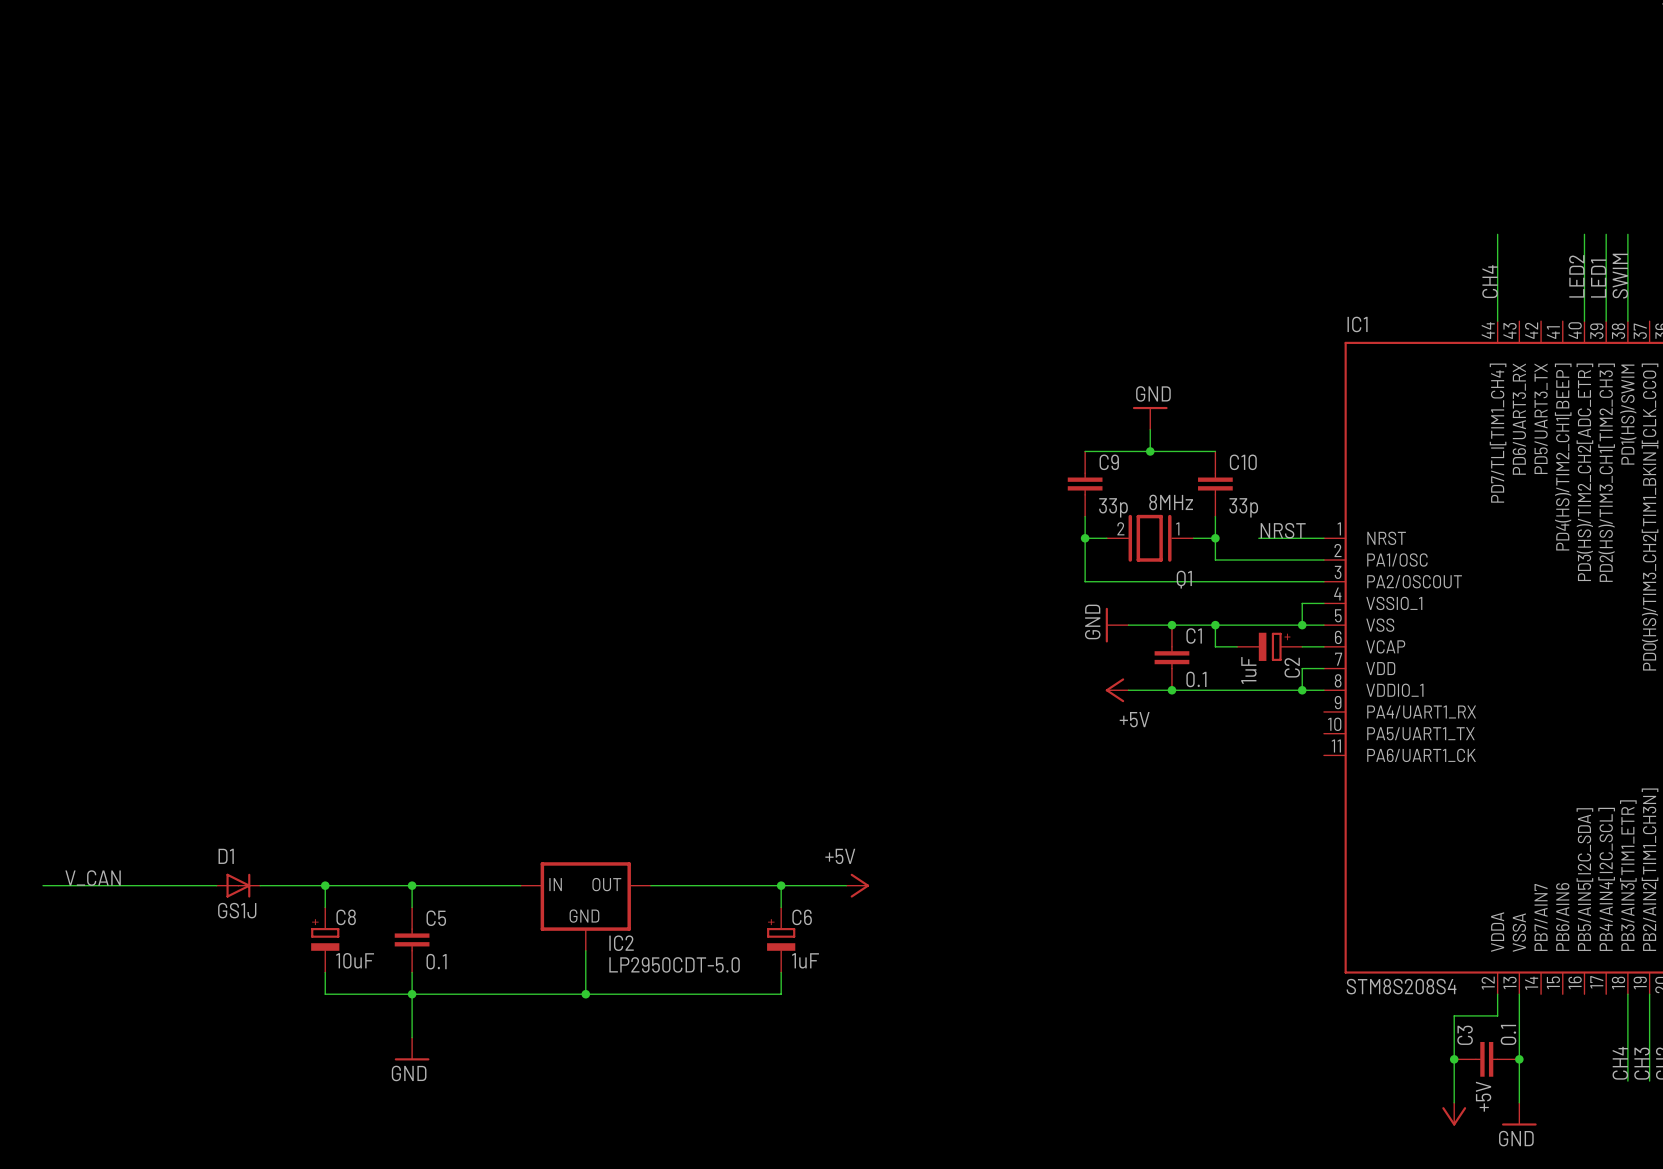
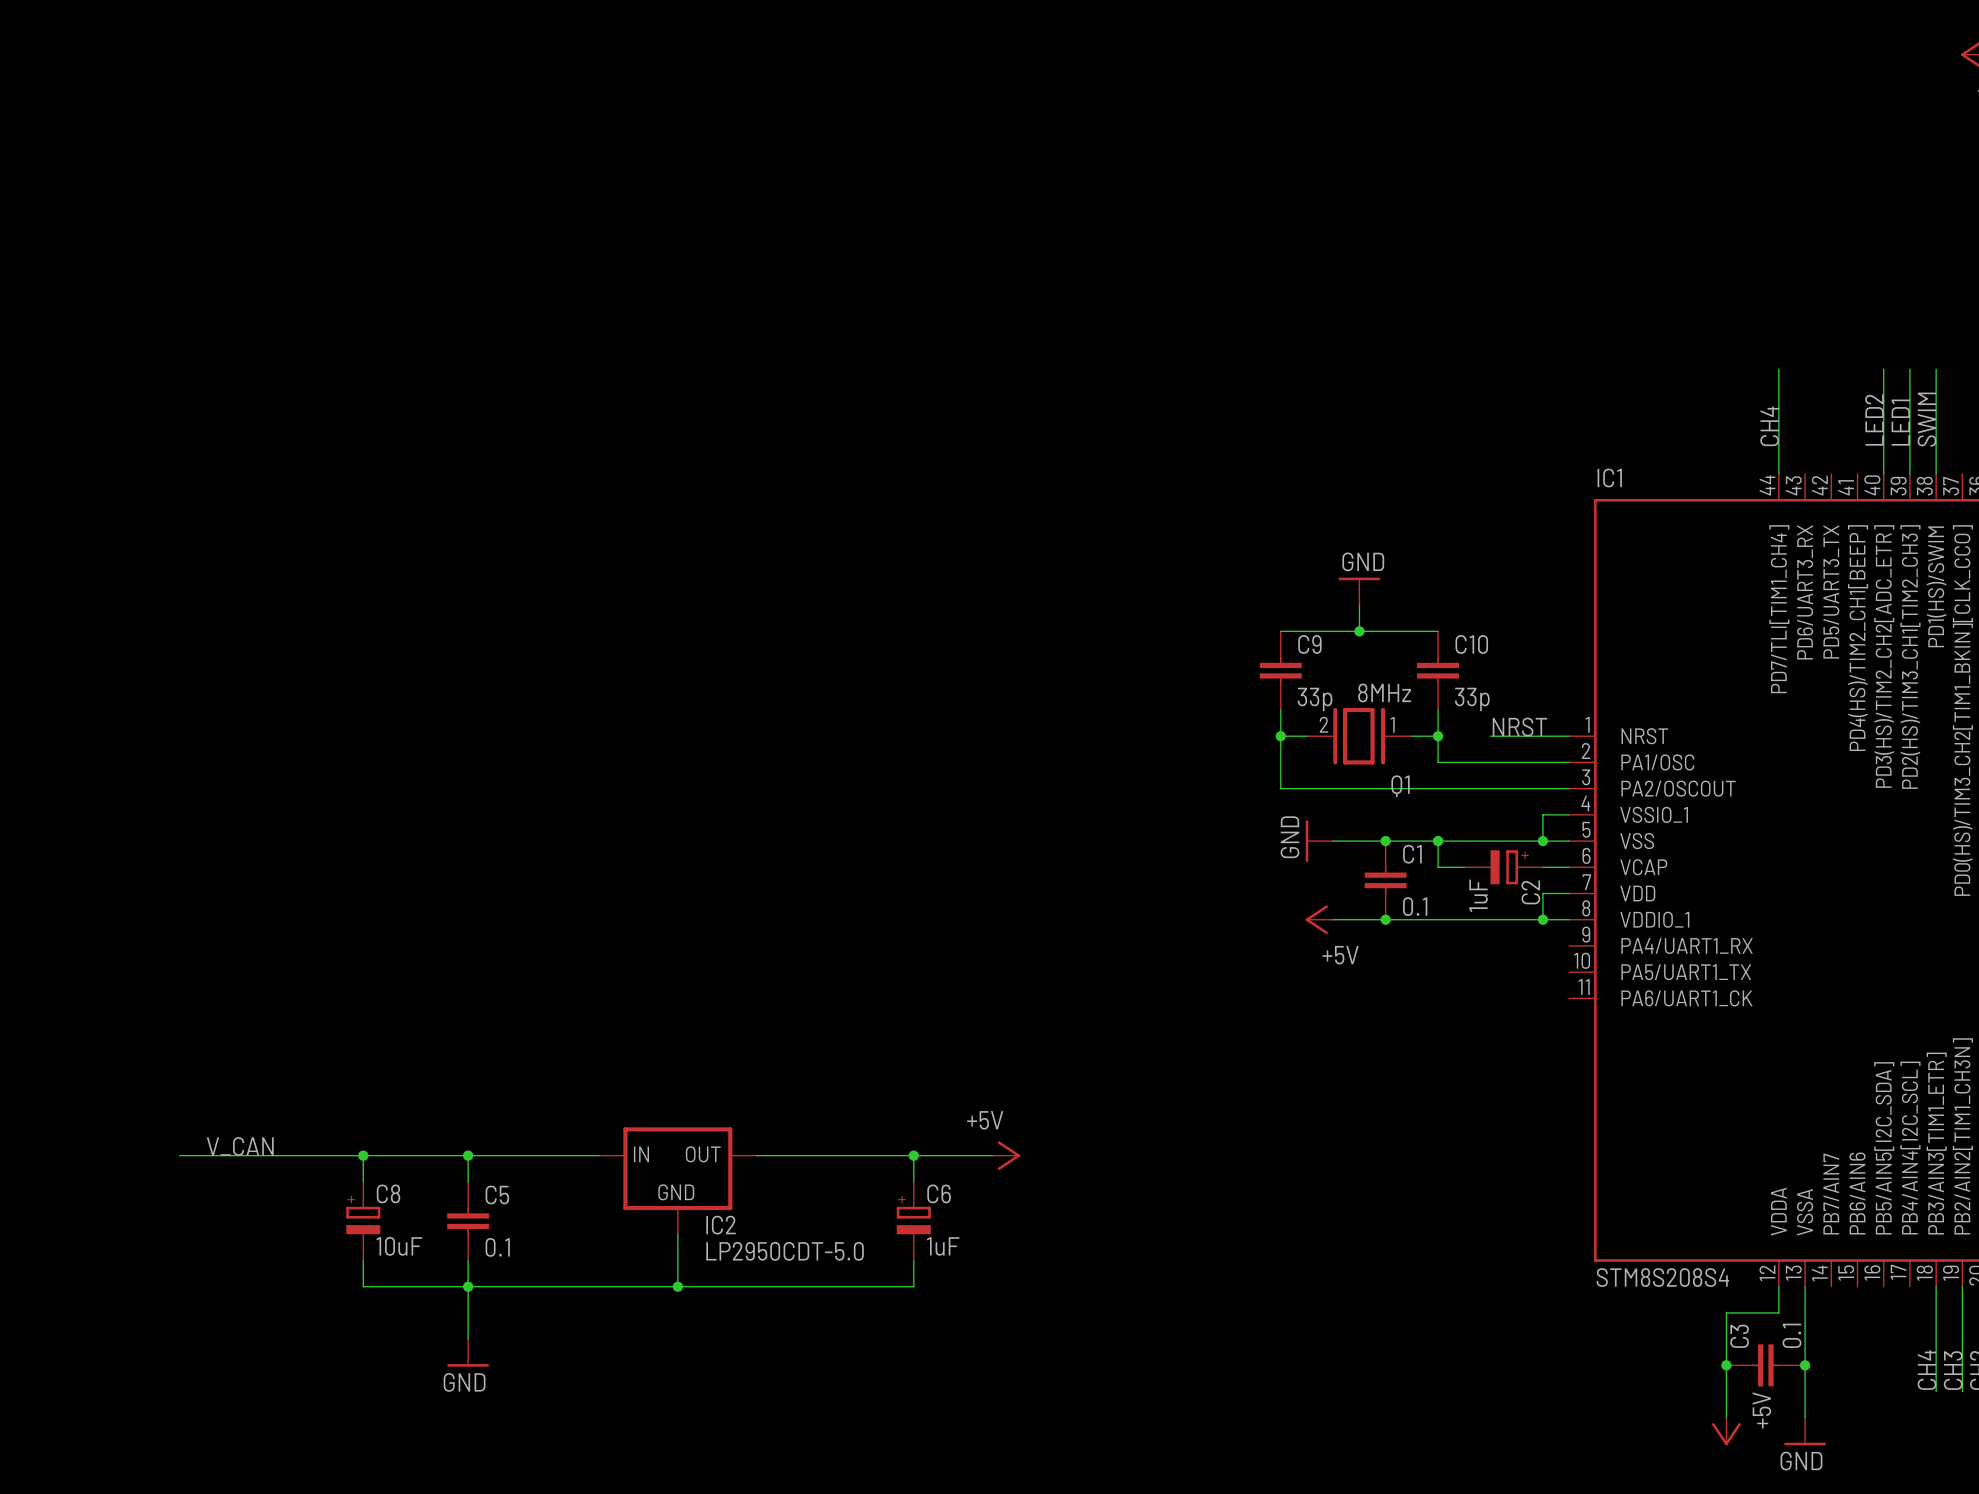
label position: V_CAN (93, 878) -> V_CAN (240, 1146)
wire: (43, 885) (173, 885) -> none
D1: GS1J (238, 885) -> none

